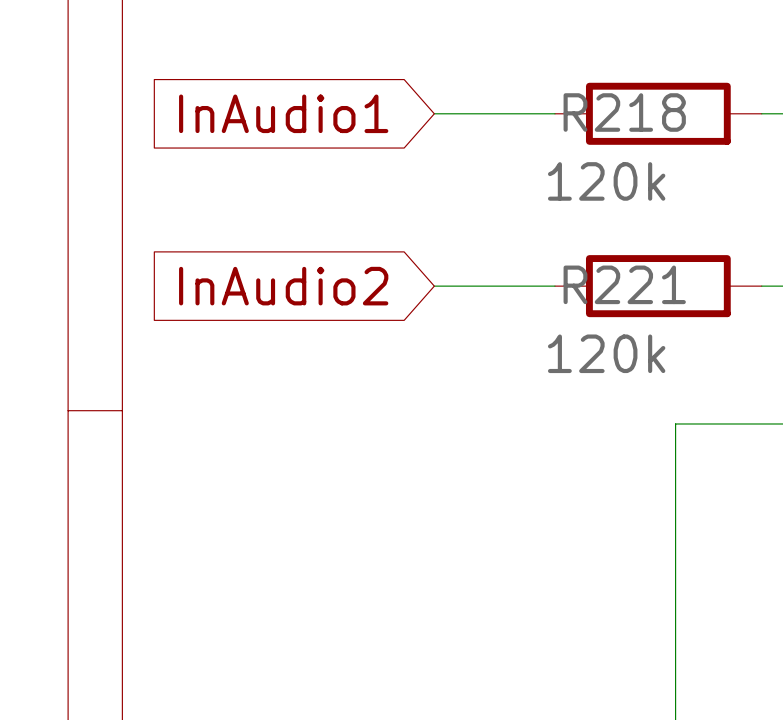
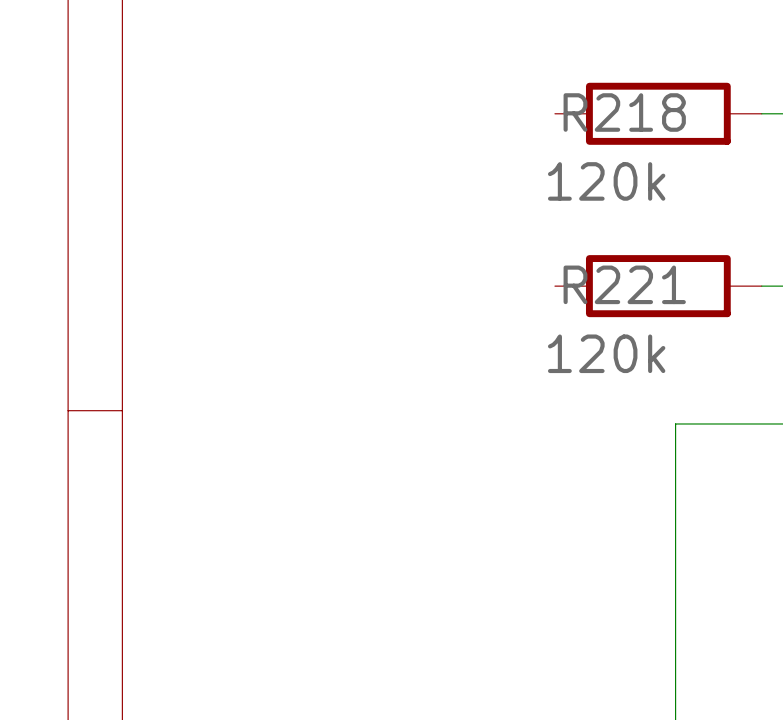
global label: InAudio1 (283, 113) -> none
wire: (434, 113) (554, 113) -> none
global label: InAudio2 (283, 286) -> none
wire: (434, 286) (554, 286) -> none

